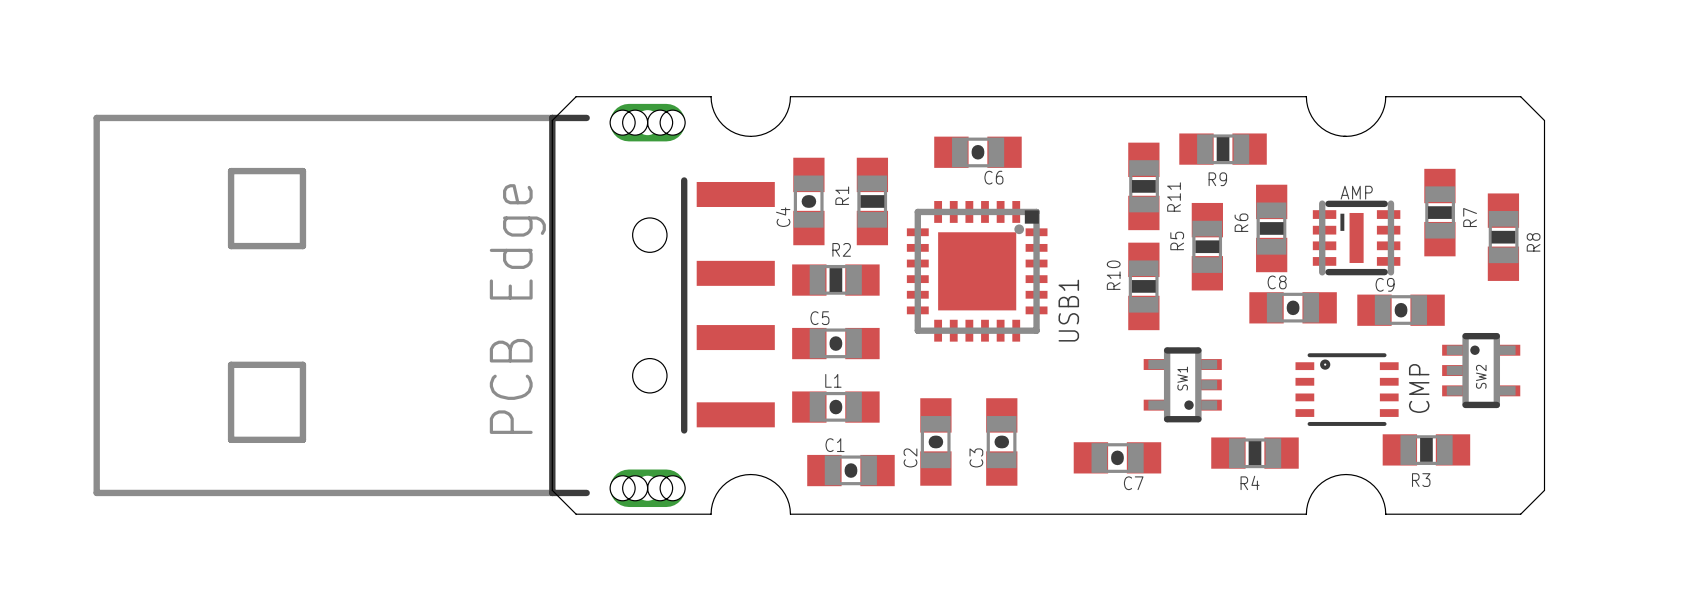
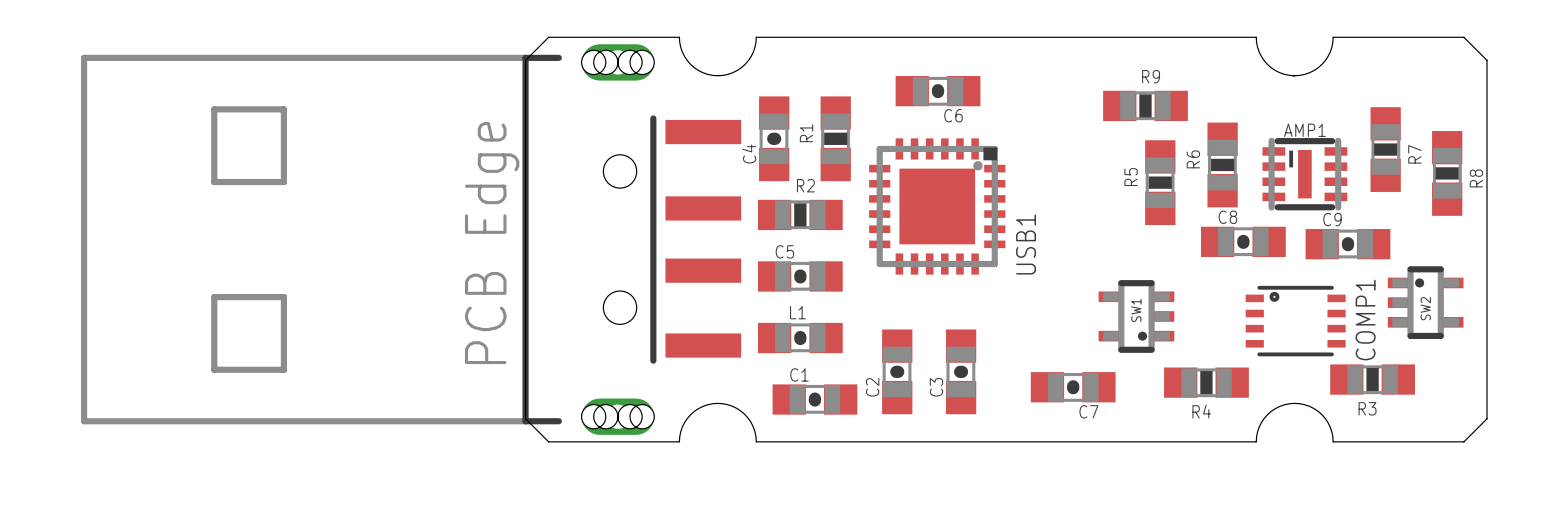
R9 position: (1223, 149) -> (1145, 105)
R9 name position: R9 (1217, 179) -> R9 (1151, 76)
R11: (1143, 186) -> none
AMP name: AMP (1356, 192) -> AMP1 (1304, 130)
R10: (1143, 286) -> none
CMP name: CMP (1419, 388) -> COMP1 (1365, 320)

